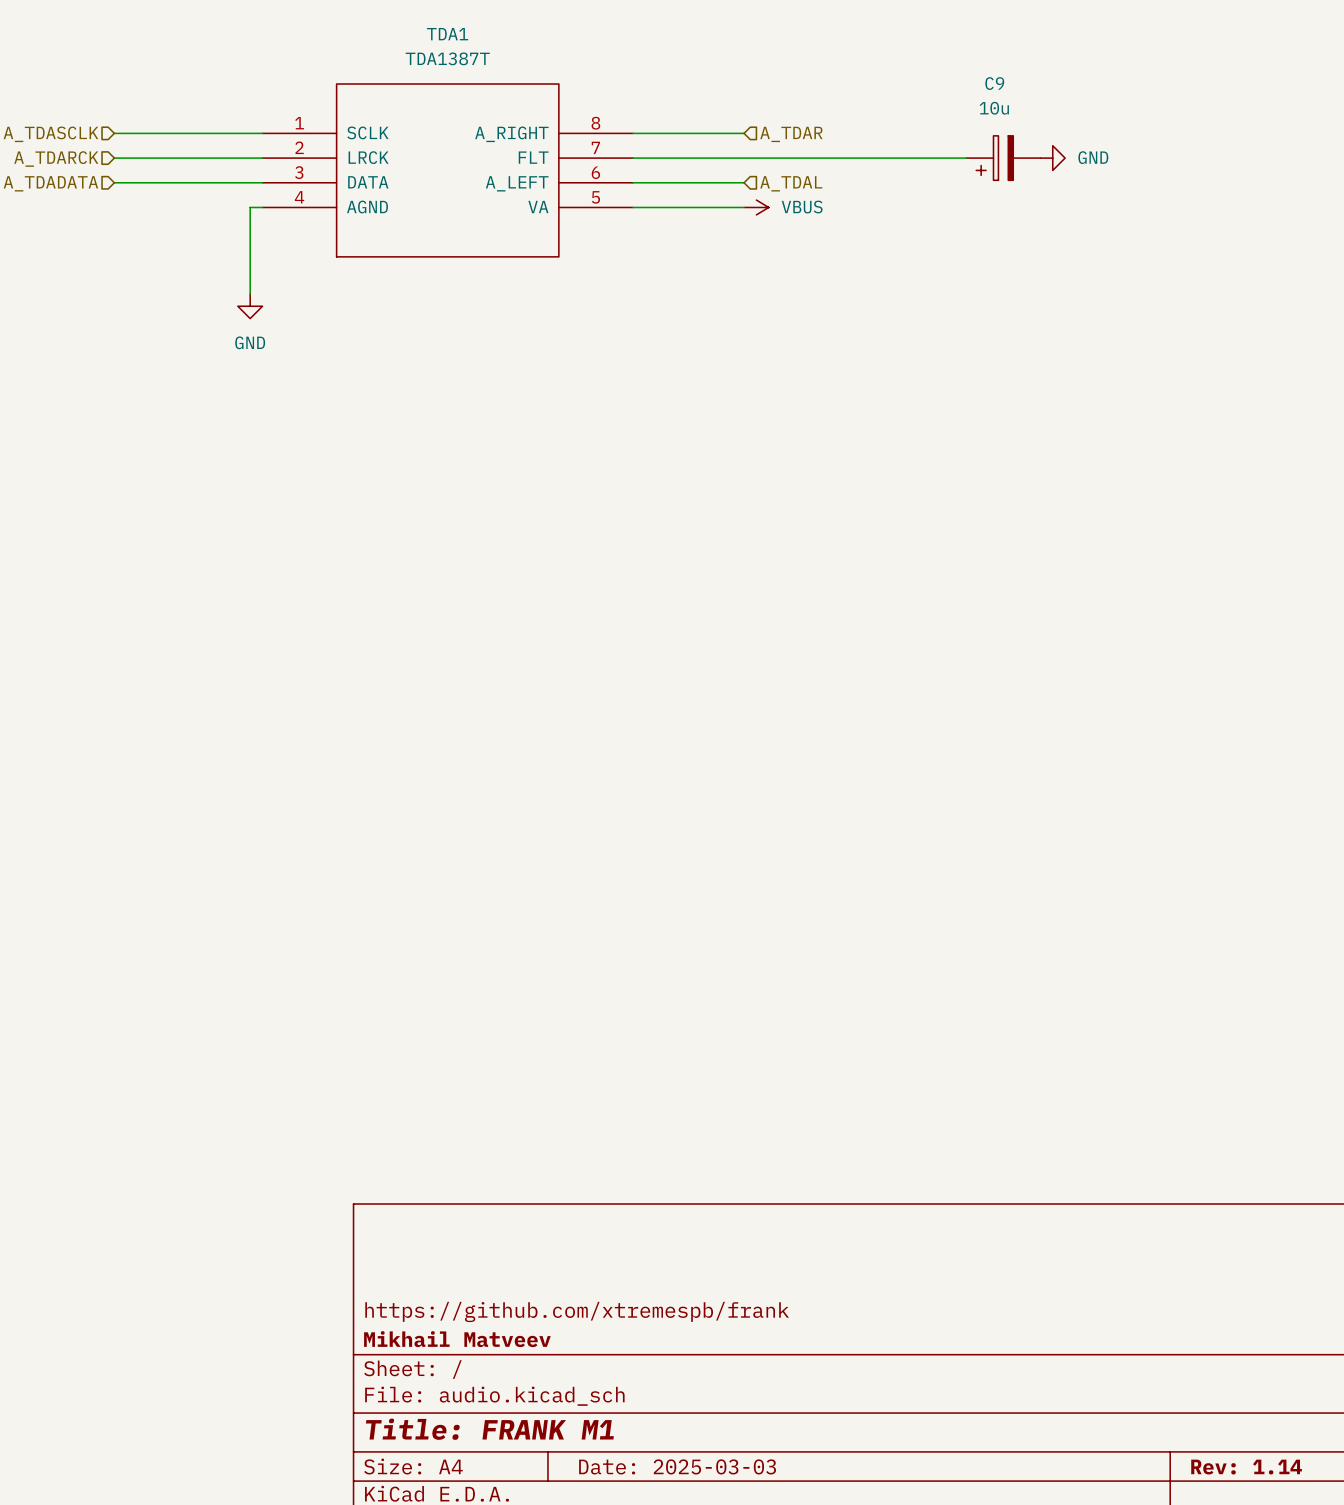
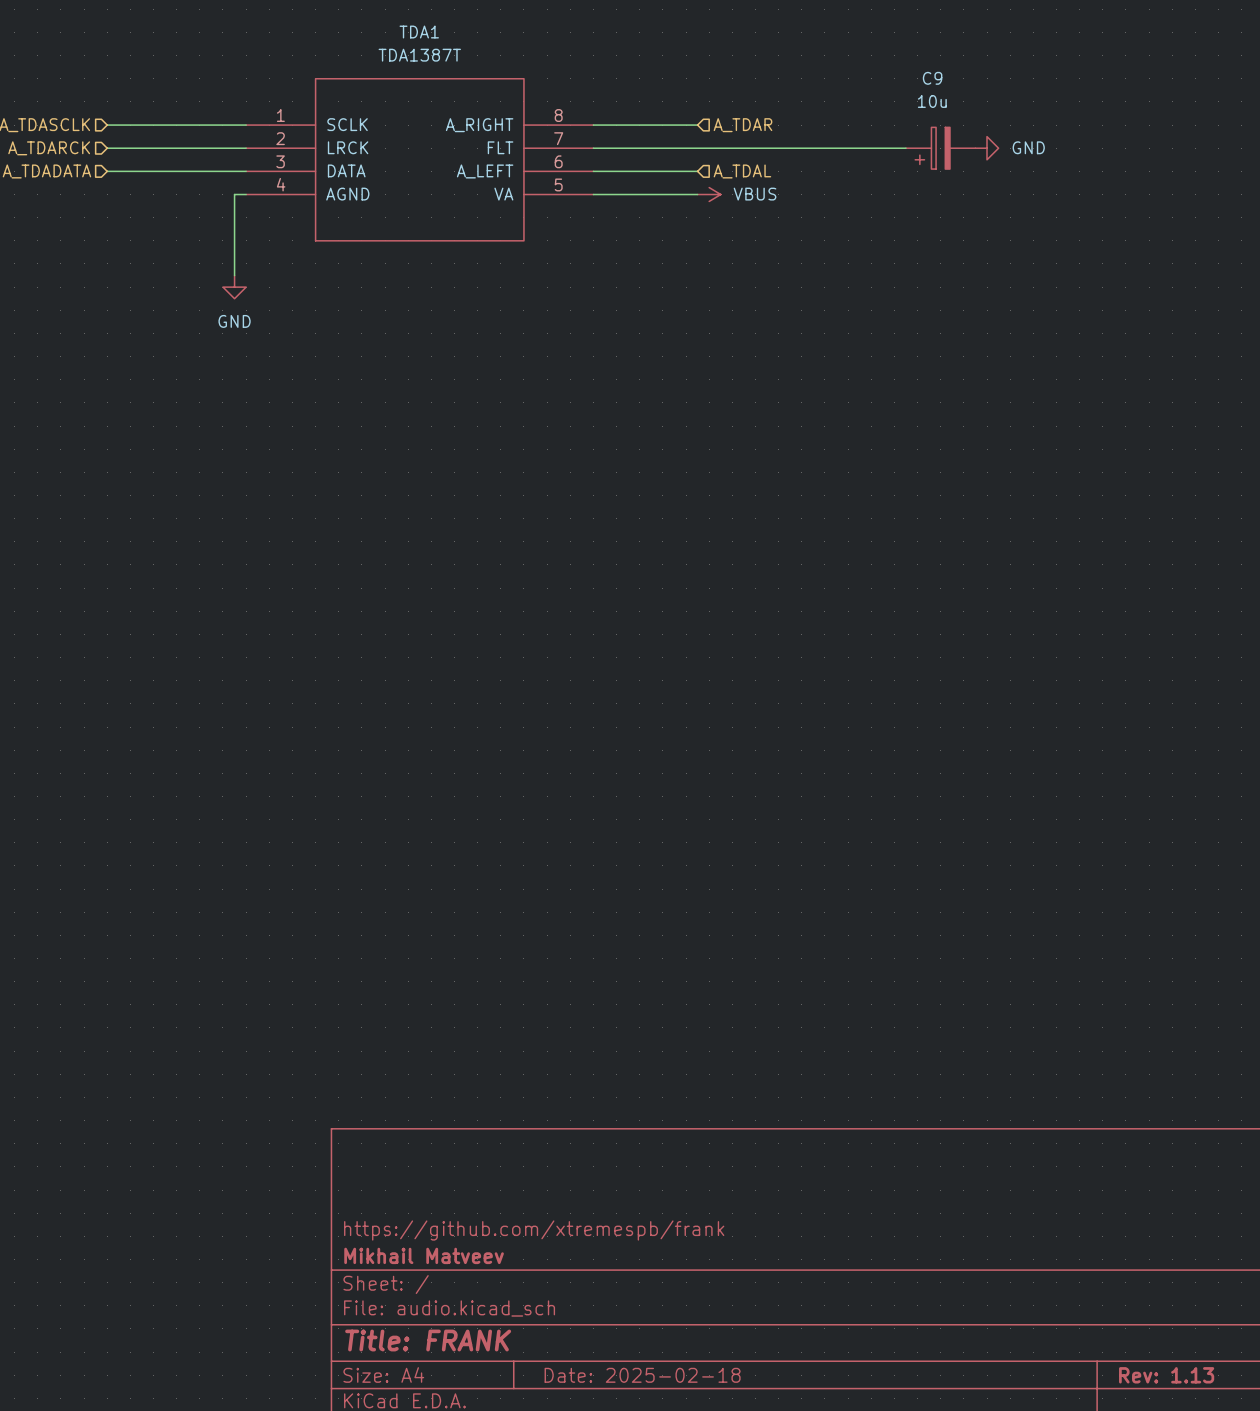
title block: Title: FRANK M1 (489, 1429) -> Title: FRANK (428, 1340)
title block: Date: 2025-03-03 (677, 1466) -> Date: 2025-02-18 (642, 1375)
title block: Rev: 1.14 (1246, 1467) -> Rev: 1.13 (1166, 1375)

